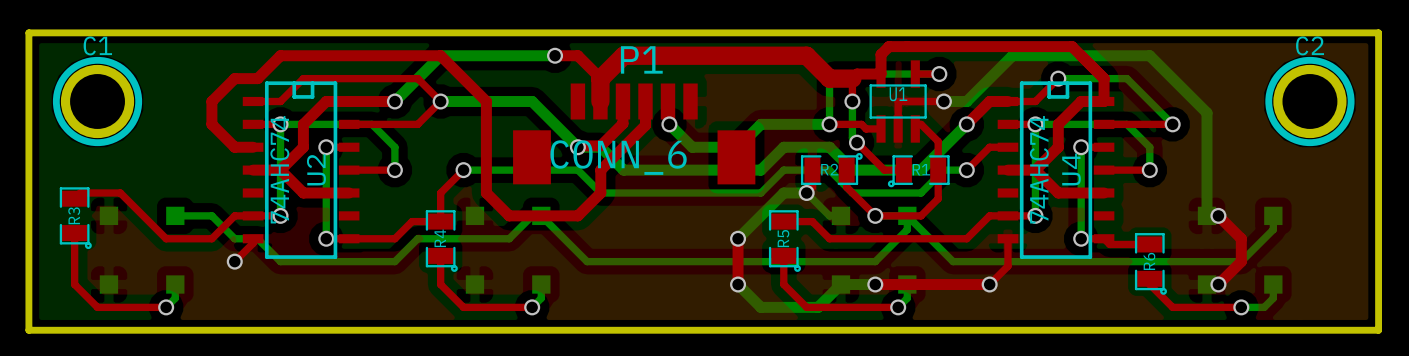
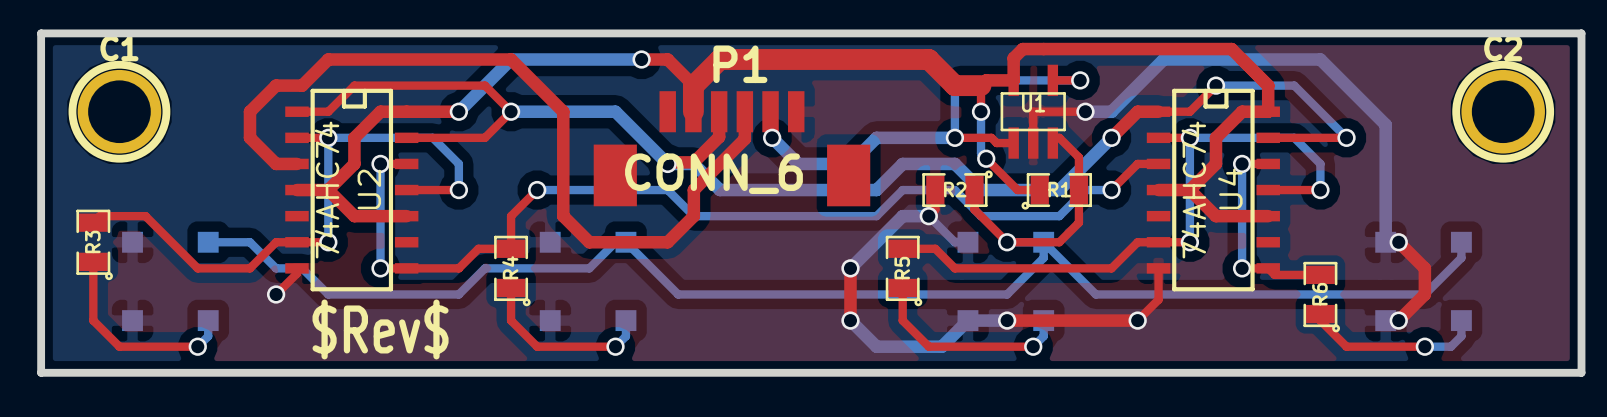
text: none -> $Rev$ (380, 329)

